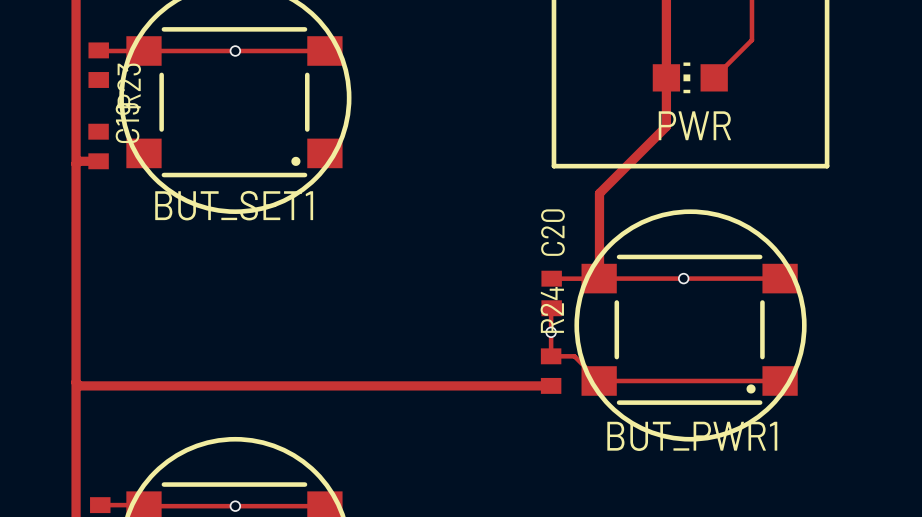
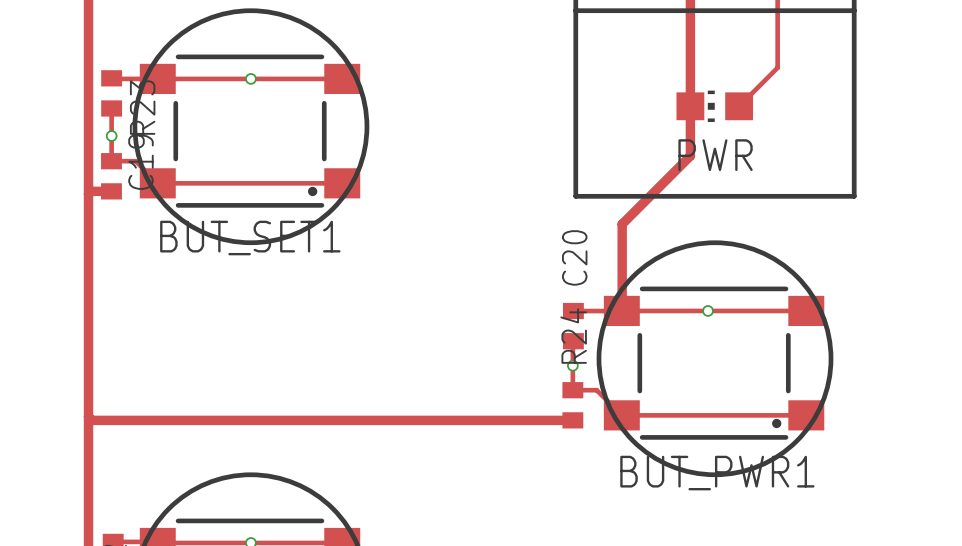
track: none -> (111, 108) (111, 161)
via: none -> (111, 135)
track: none -> (111, 161) (135, 161) (157, 183) (342, 183)

